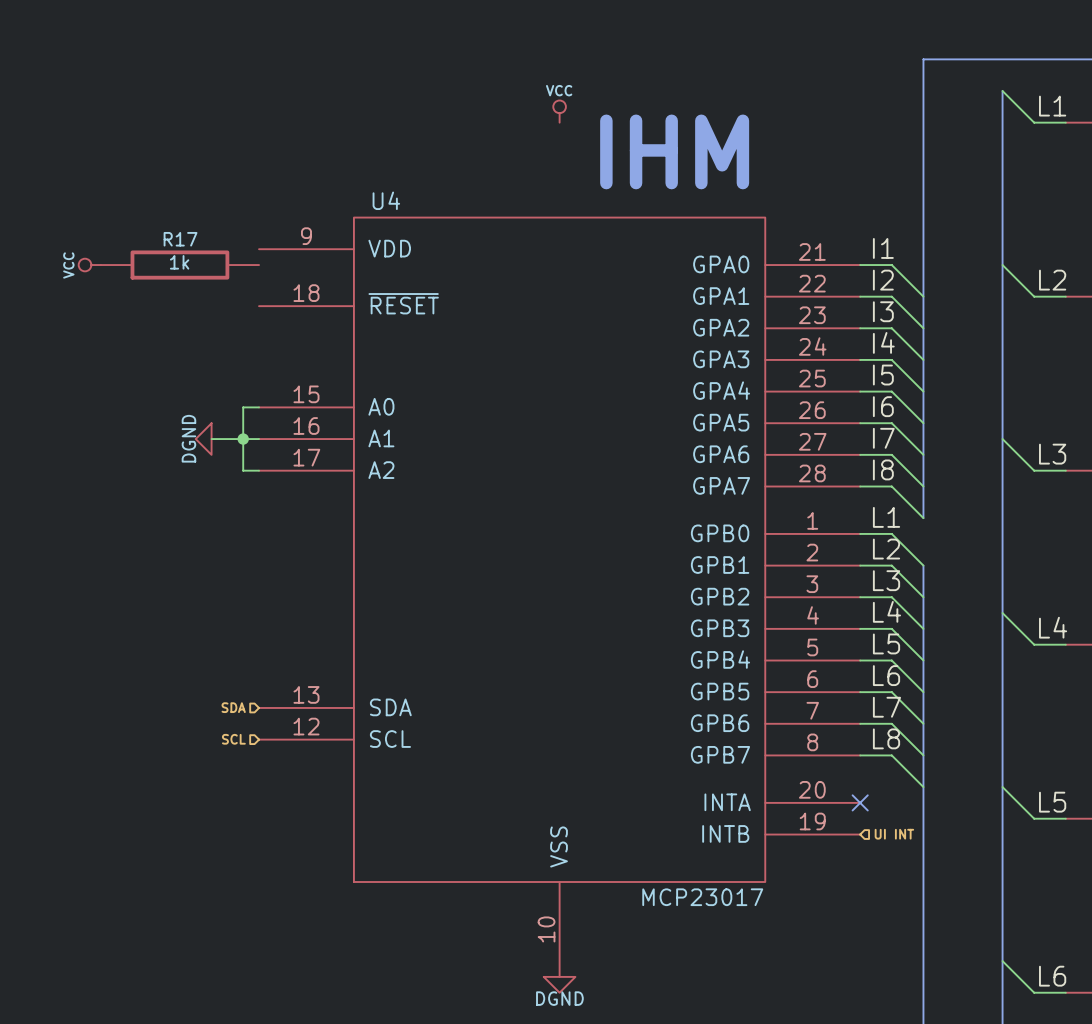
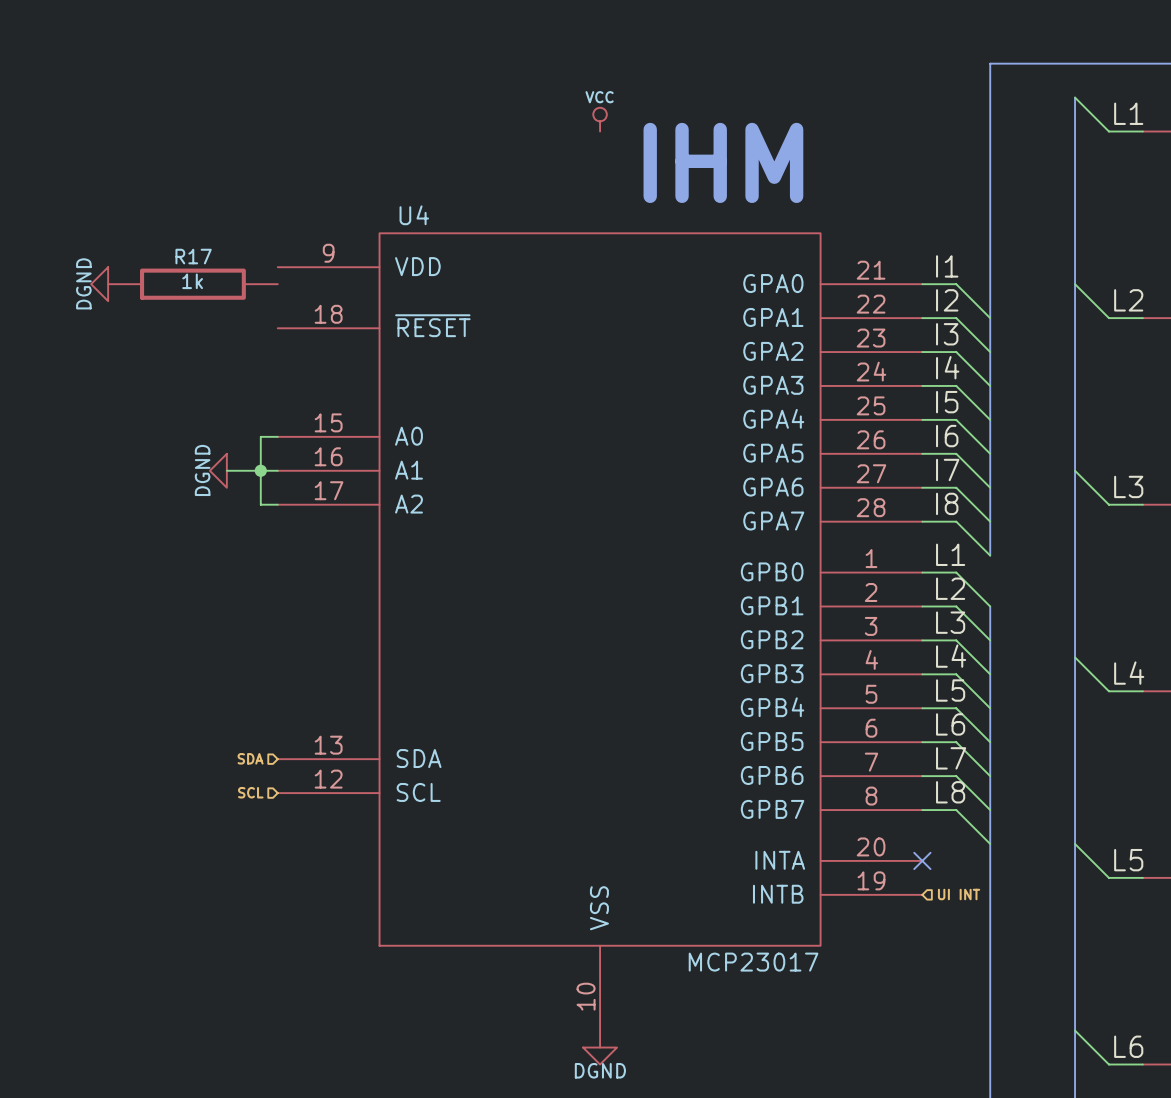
power symbol: VCC (89, 265) -> DGND (99, 284)

